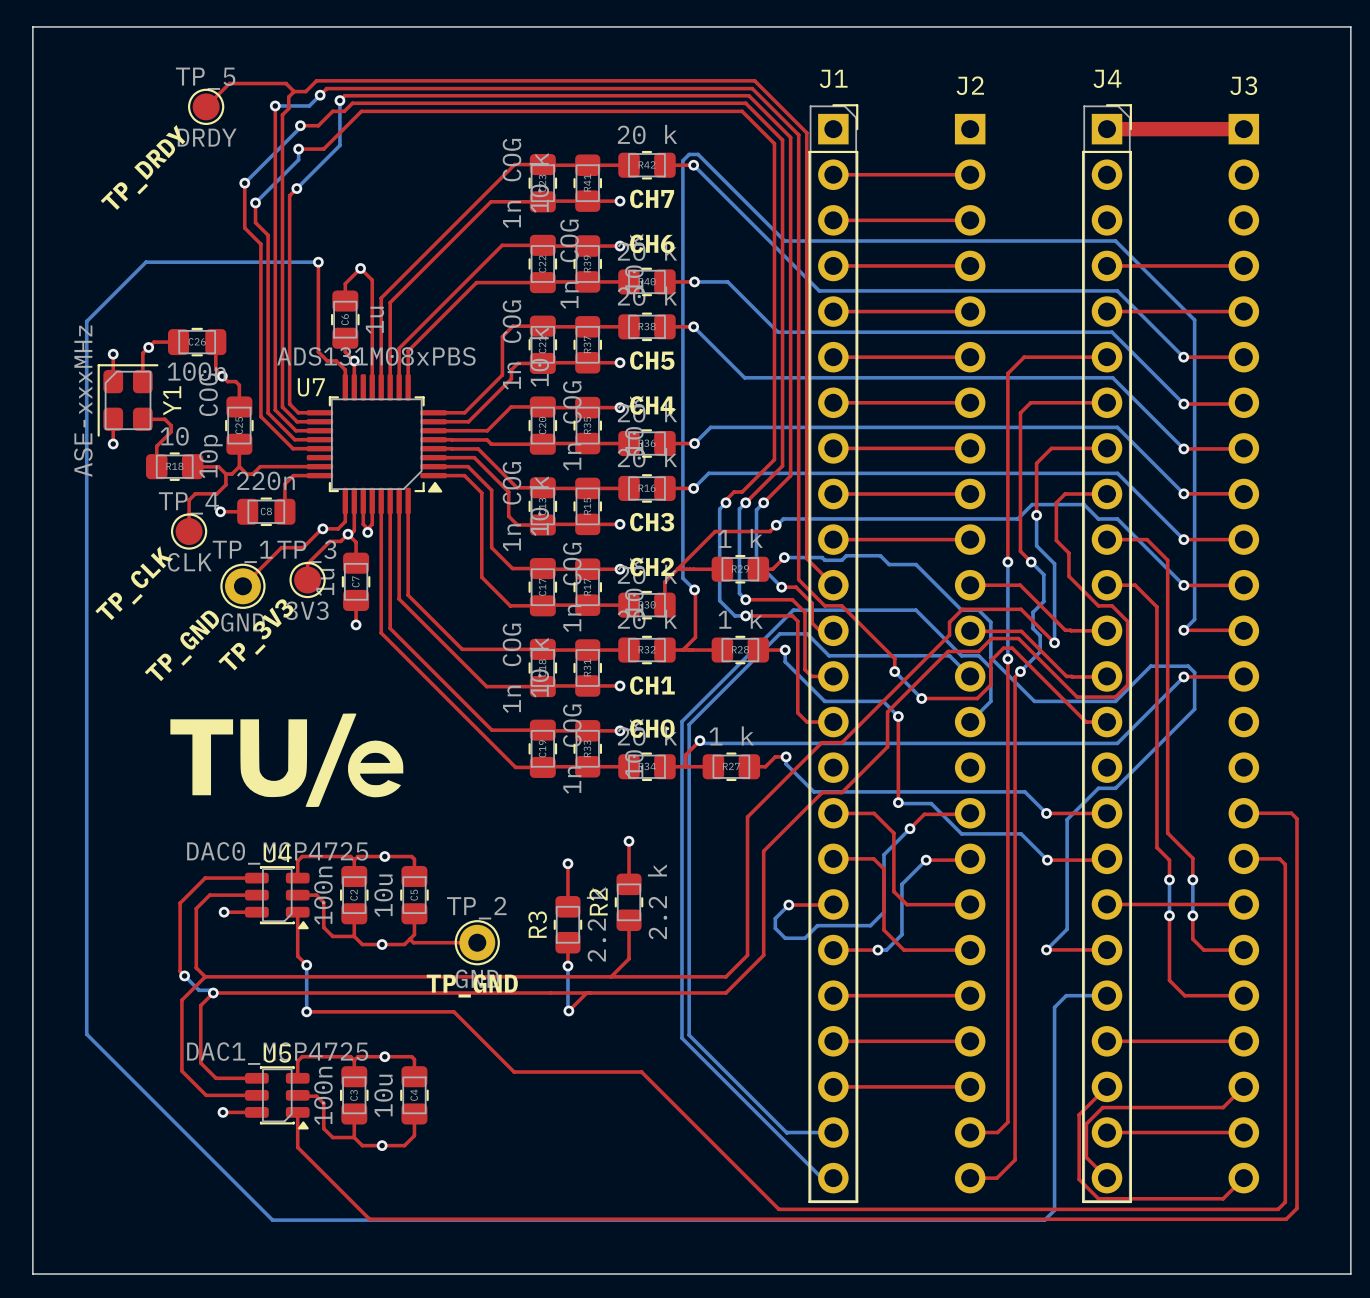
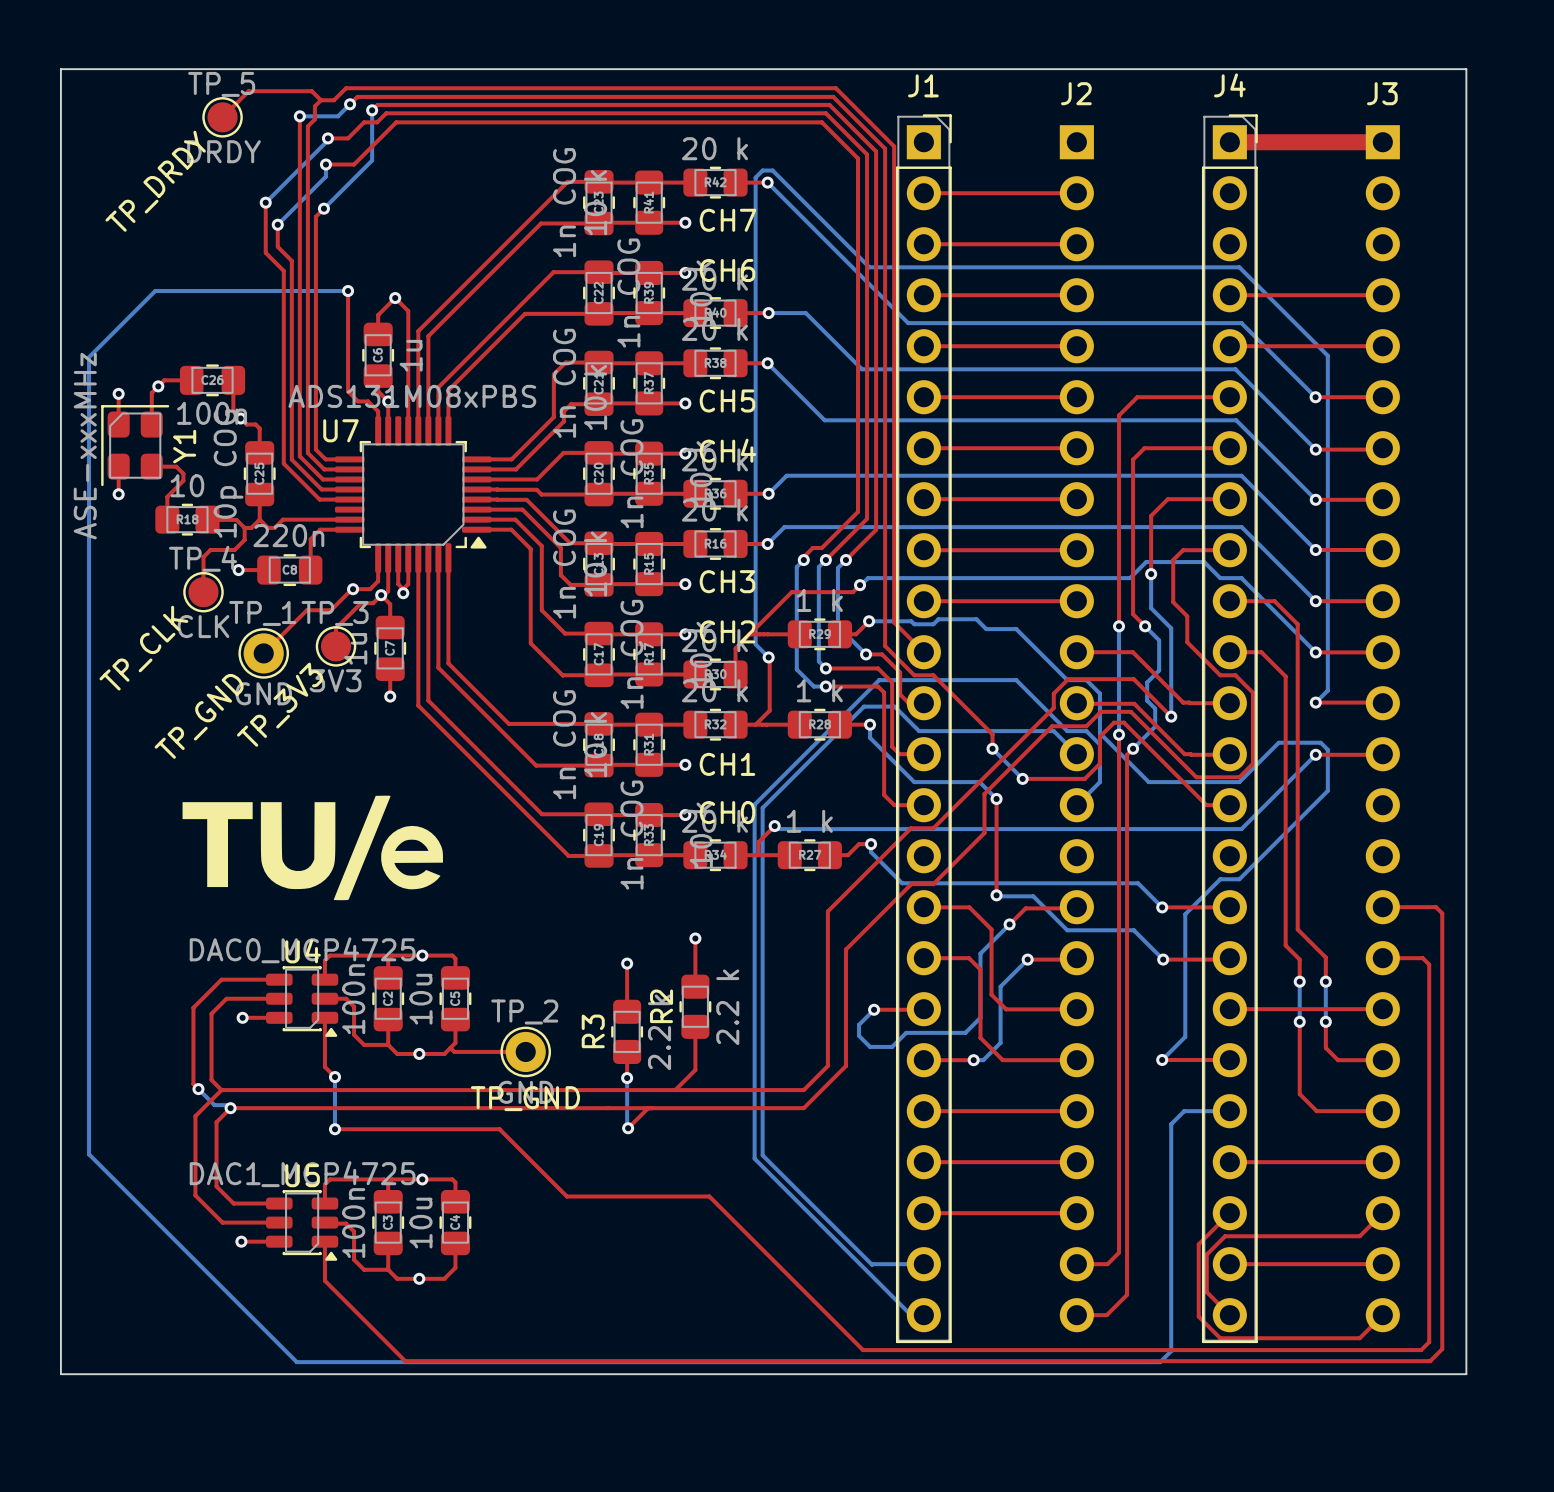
board edge: (32, 26) (1350, 26) (1350, 1274) (32, 1274) (32, 26) -> (60, 69) (60, 1374) (1466, 1374) (1466, 69) (60, 69)

